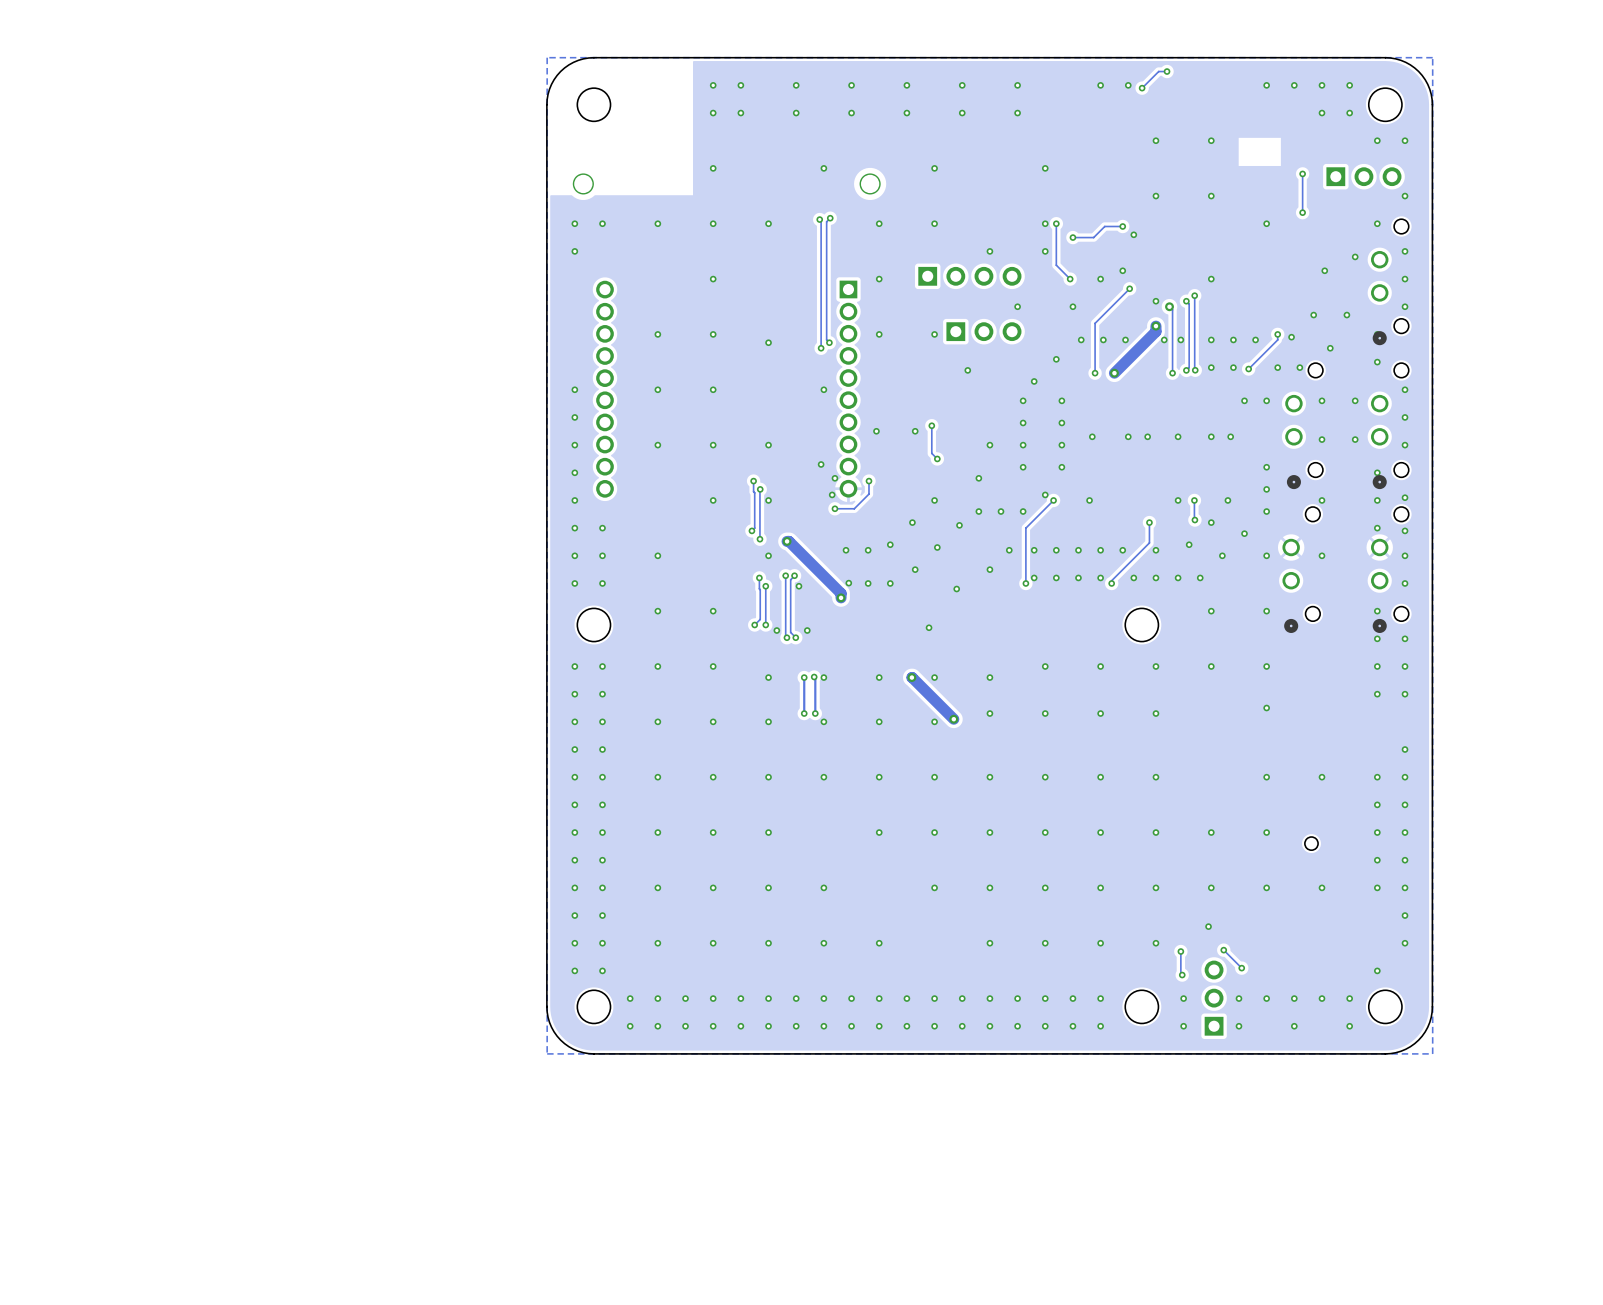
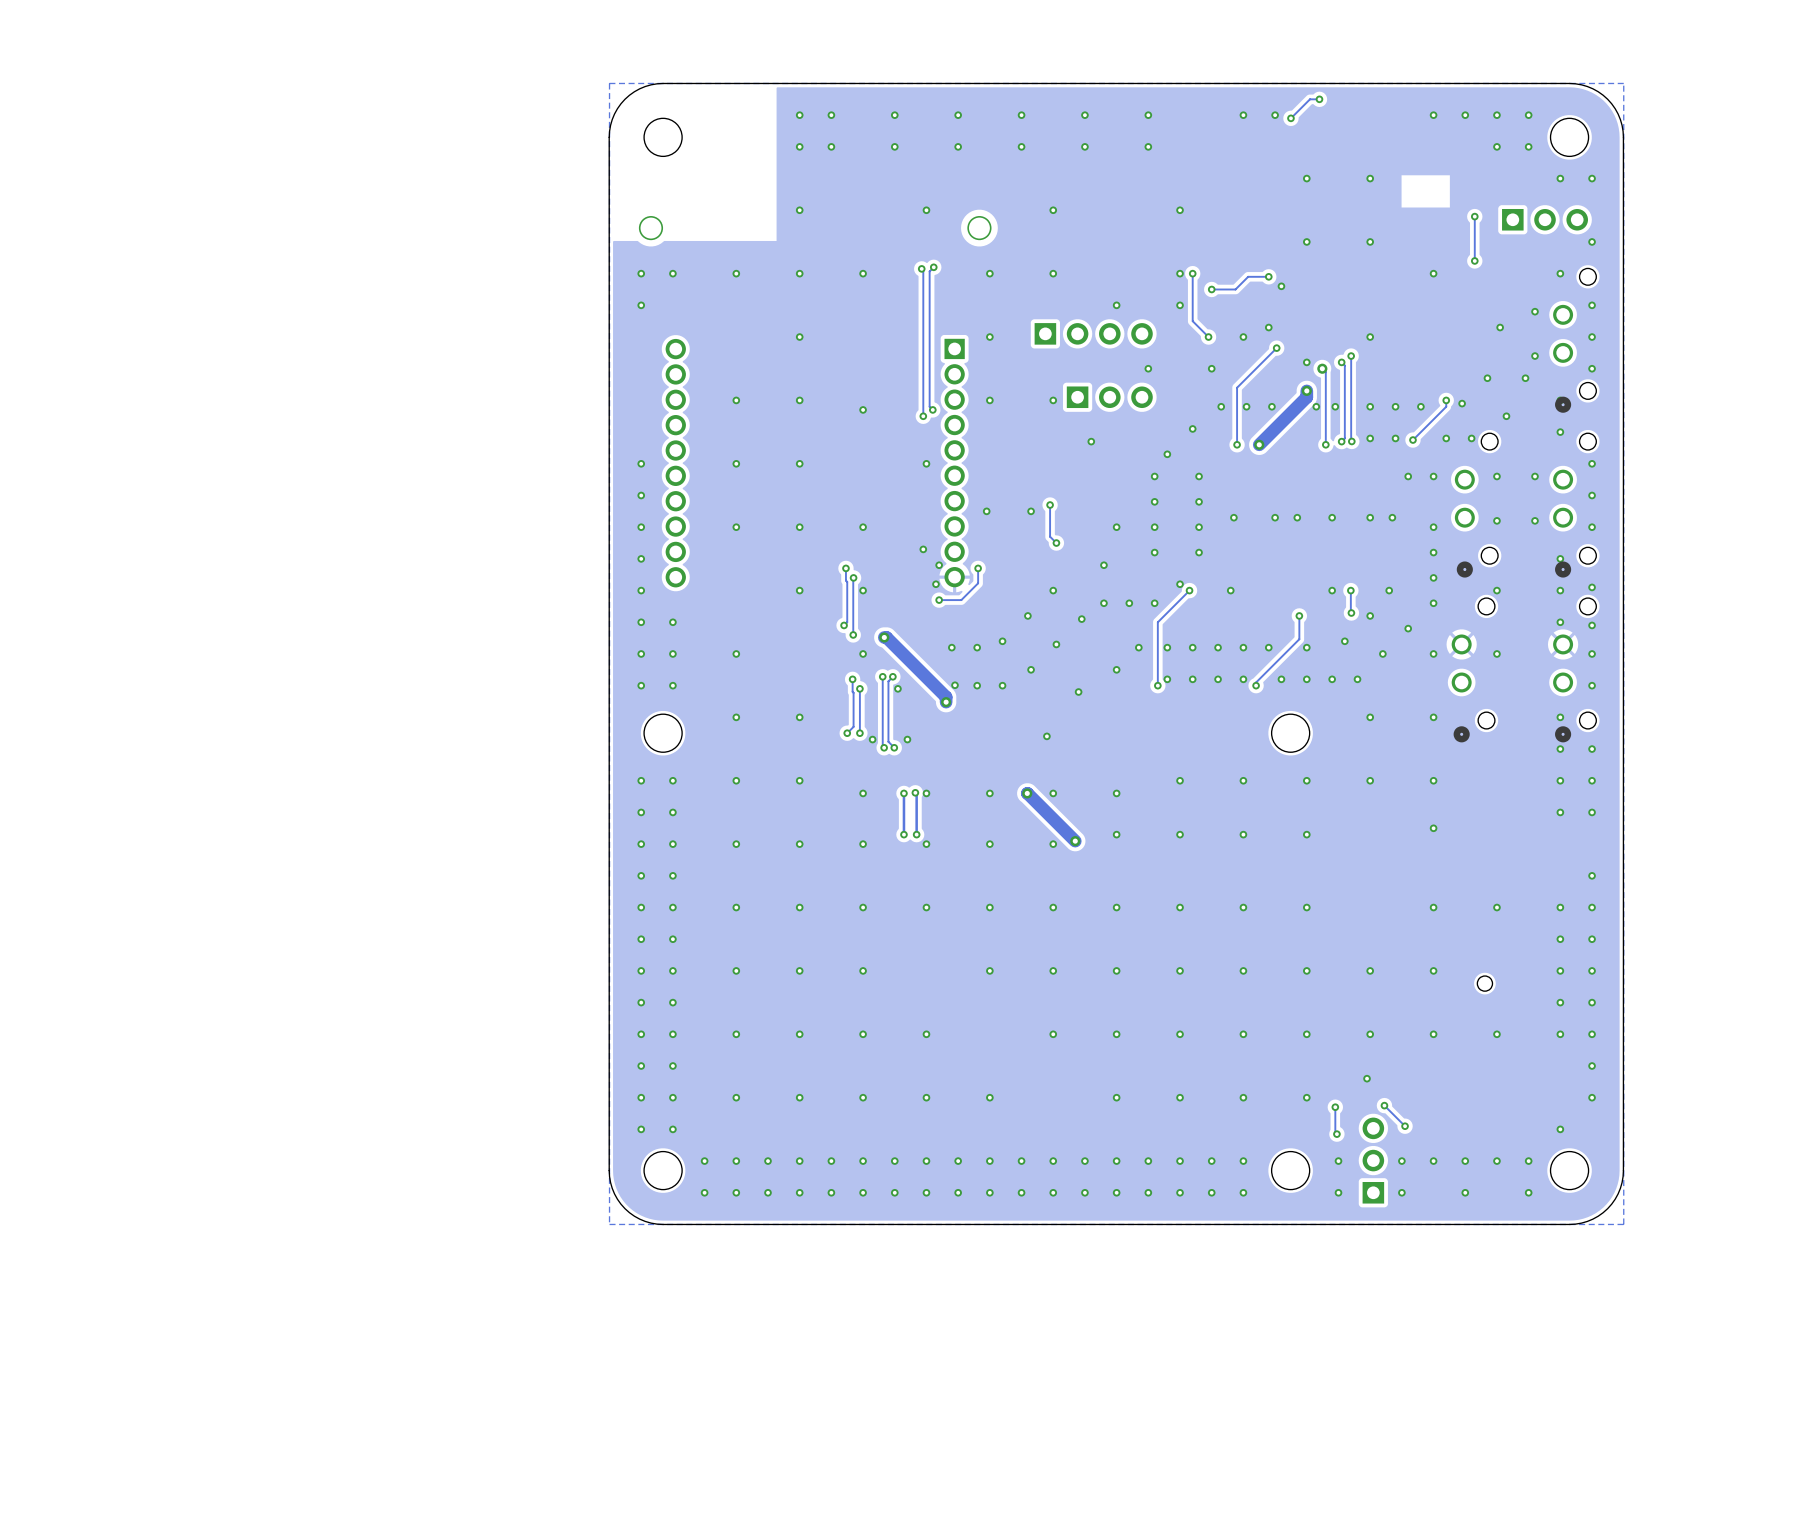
via: none -> (1535, 356)
via: none -> (1433, 527)

